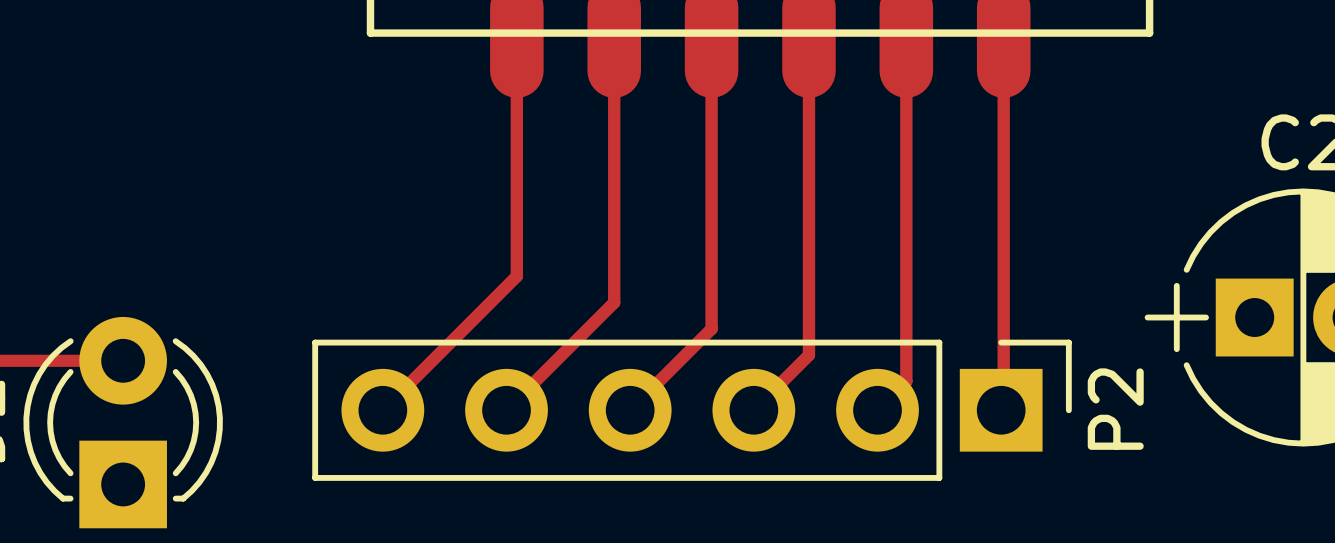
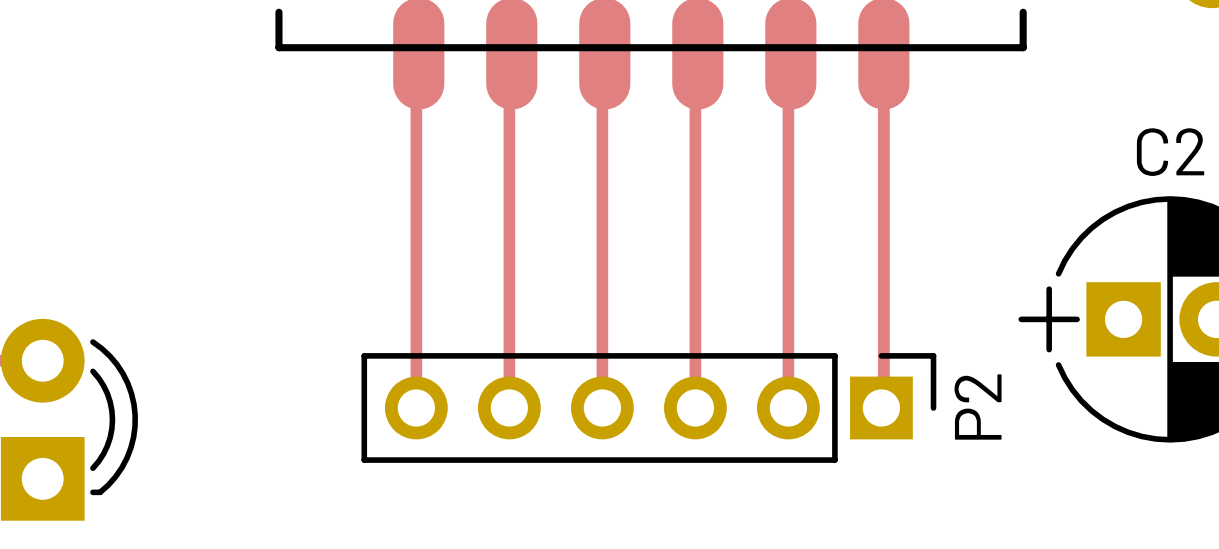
top track: (516, 39) (516, 276) (382, 410) -> none
top track: (614, 39) (614, 302) (506, 410) -> none
top track: (711, 39) (711, 328) (630, 410) -> none
top track: (808, 39) (808, 355) (753, 410) -> none
top track: (906, 39) (906, 381) (877, 410) -> none
top track: none -> (416, 56) (416, 407)
top track: none -> (509, 56) (509, 407)
top track: none -> (602, 56) (602, 407)
top track: none -> (695, 56) (695, 407)
top track: none -> (788, 56) (788, 407)
P2 footprint: [312, 339, 1072, 481] -> [361, 353, 937, 463]

